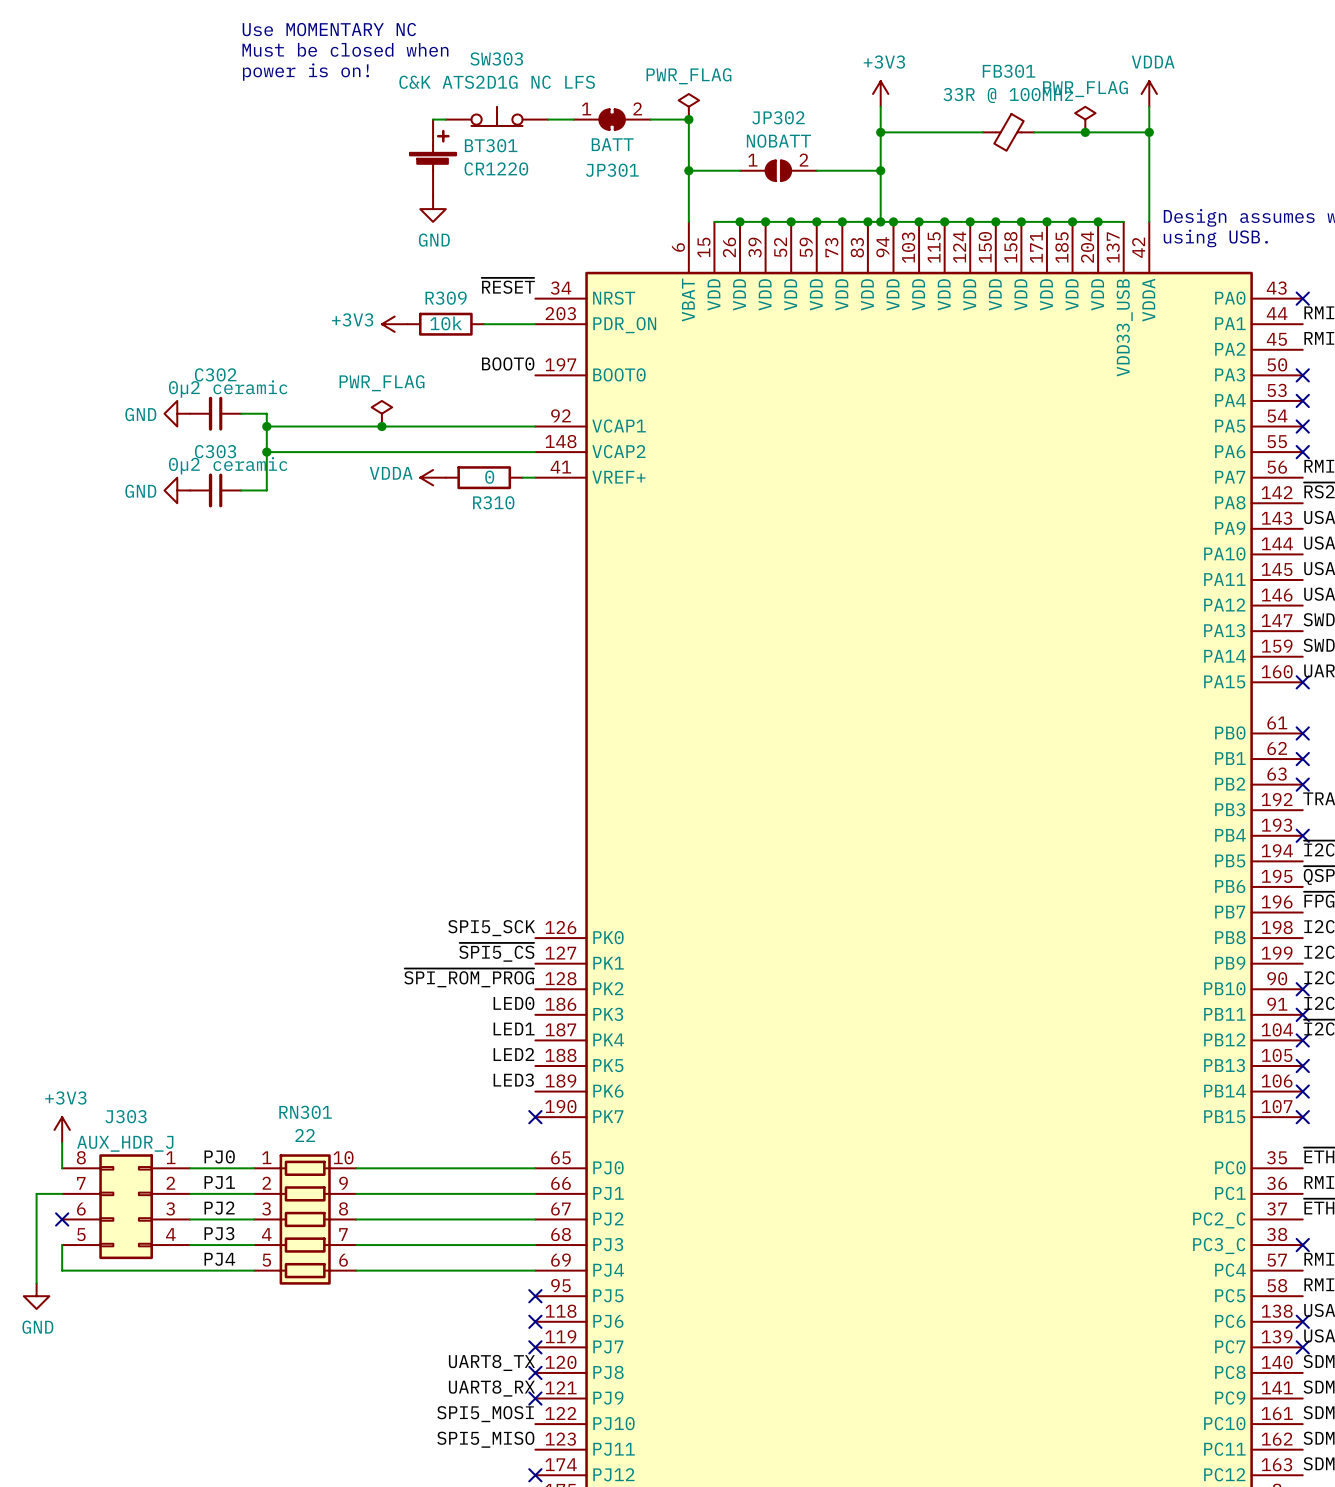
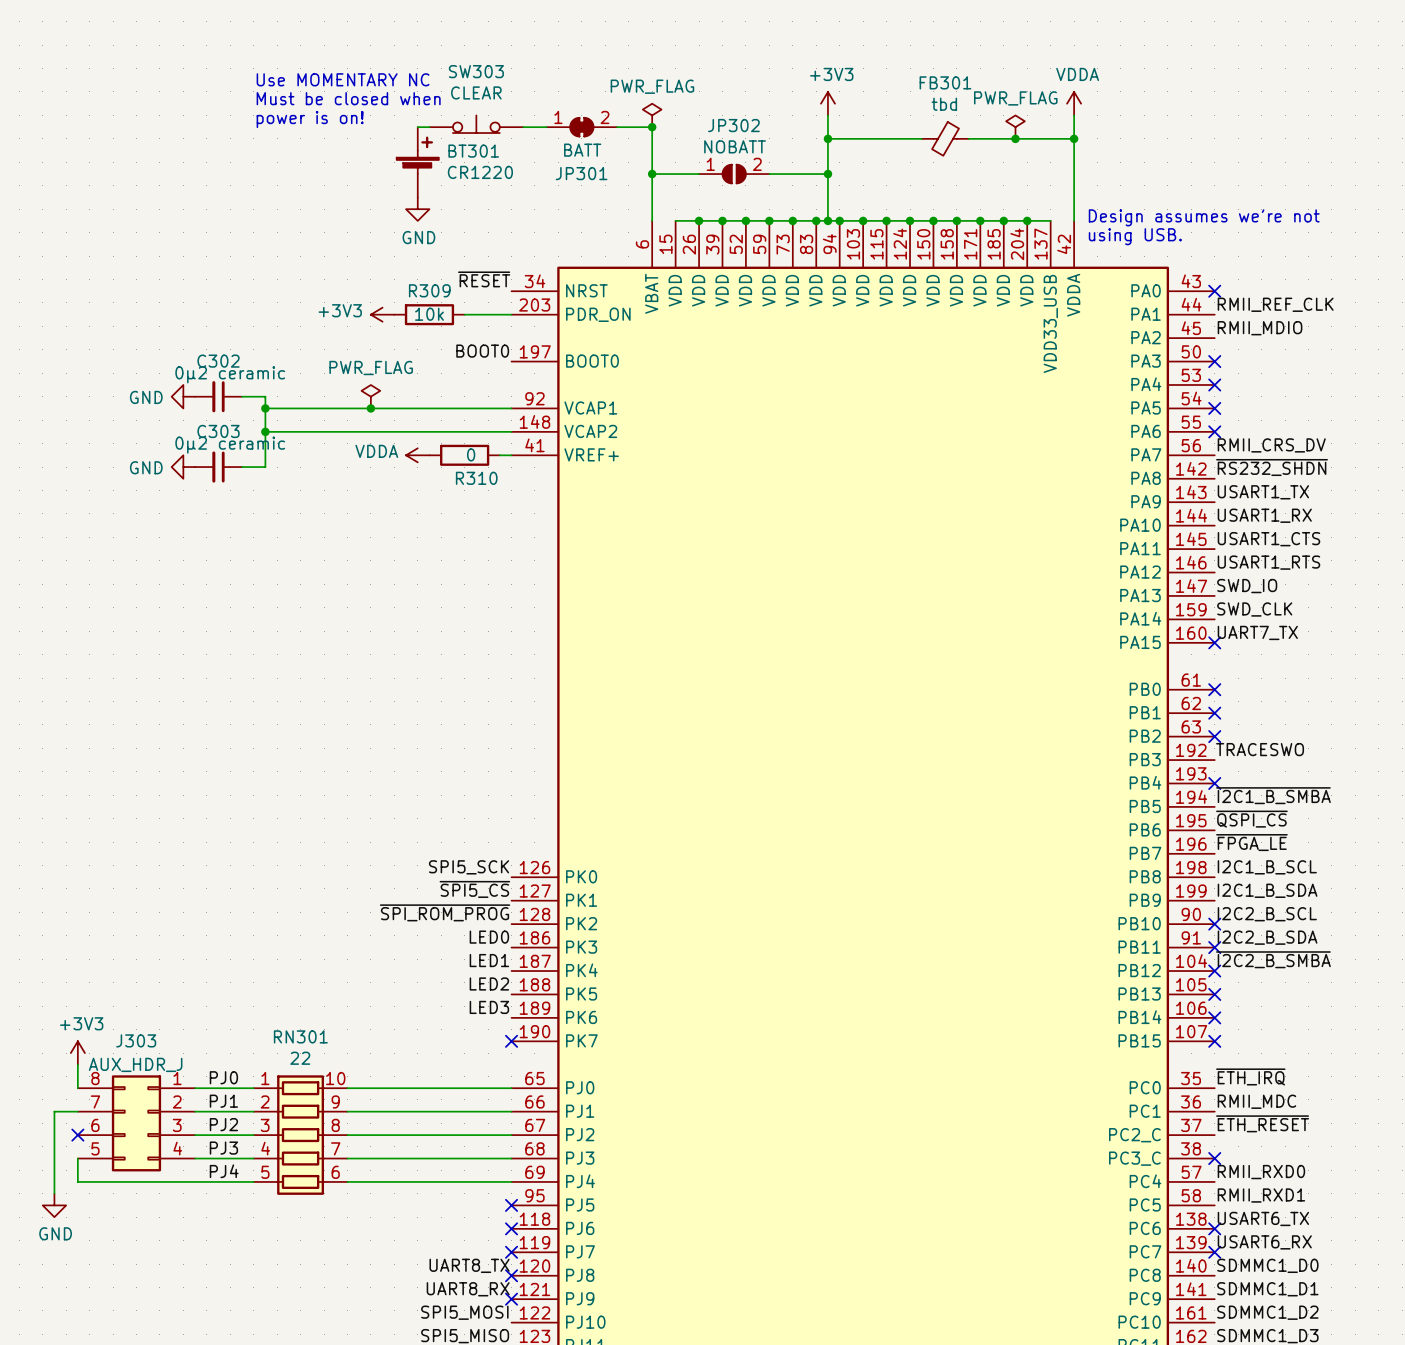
text position: Use MOMENTARY NC (329, 29) -> Use MOMENTARY NC (343, 79)
text position: Must be closed when (345, 49) -> Must be closed when (348, 98)
text position: power is on! (305, 72) -> power is on! (310, 119)
SW303 value: C&K ATS2D1G NC LFS (497, 82) -> CLEAR (476, 92)
FB301 value: 33R @ 100MHz (1008, 95) -> tbd (944, 104)

